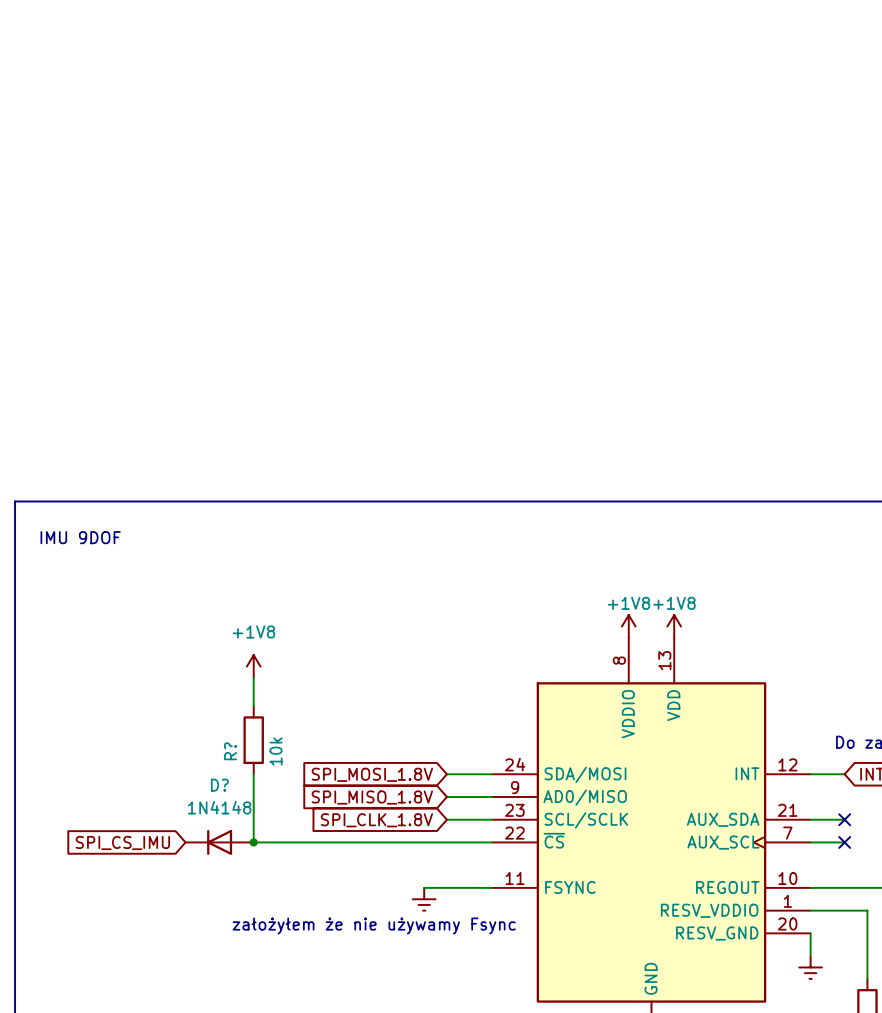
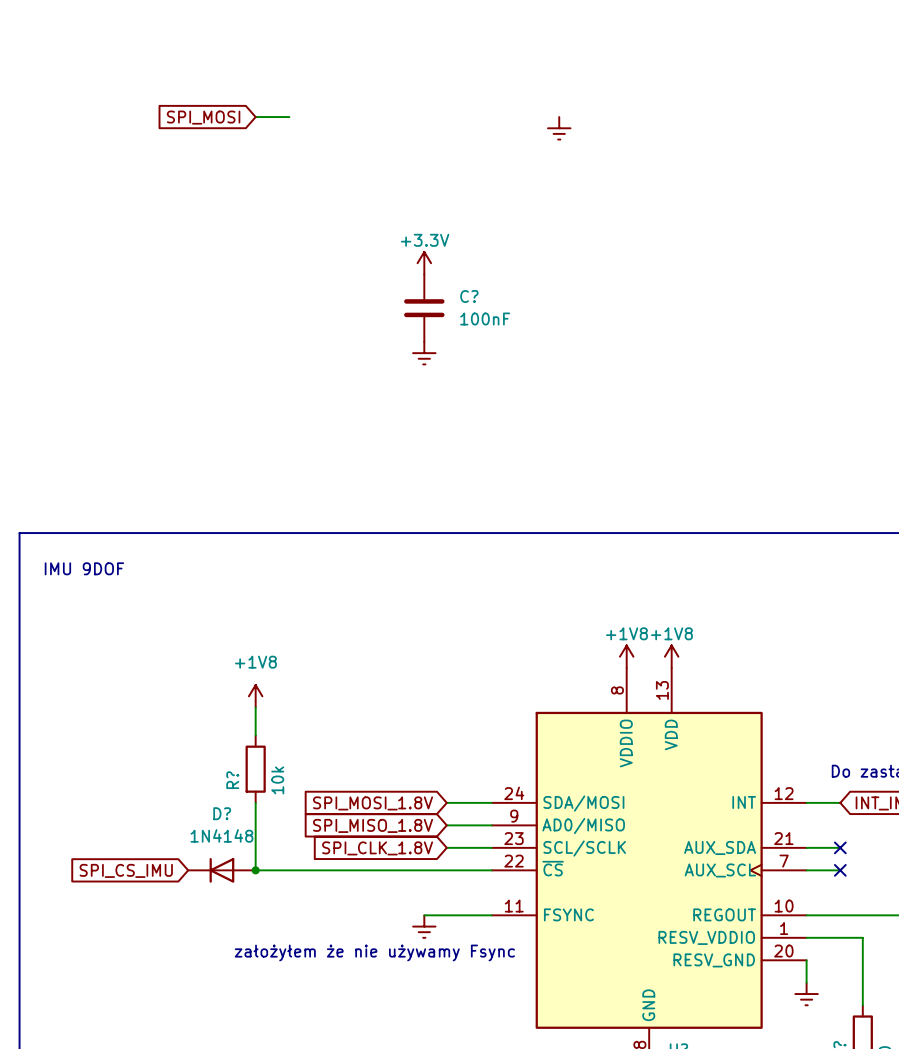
wire: none -> (255, 117) (289, 117)
global label: none -> SPI_MOSI (203, 117)
power symbol: none -> (559, 128)
power symbol: none -> +3.3V (424, 263)
C?: none -> 100nF (424, 308)
power symbol: none -> (424, 353)

